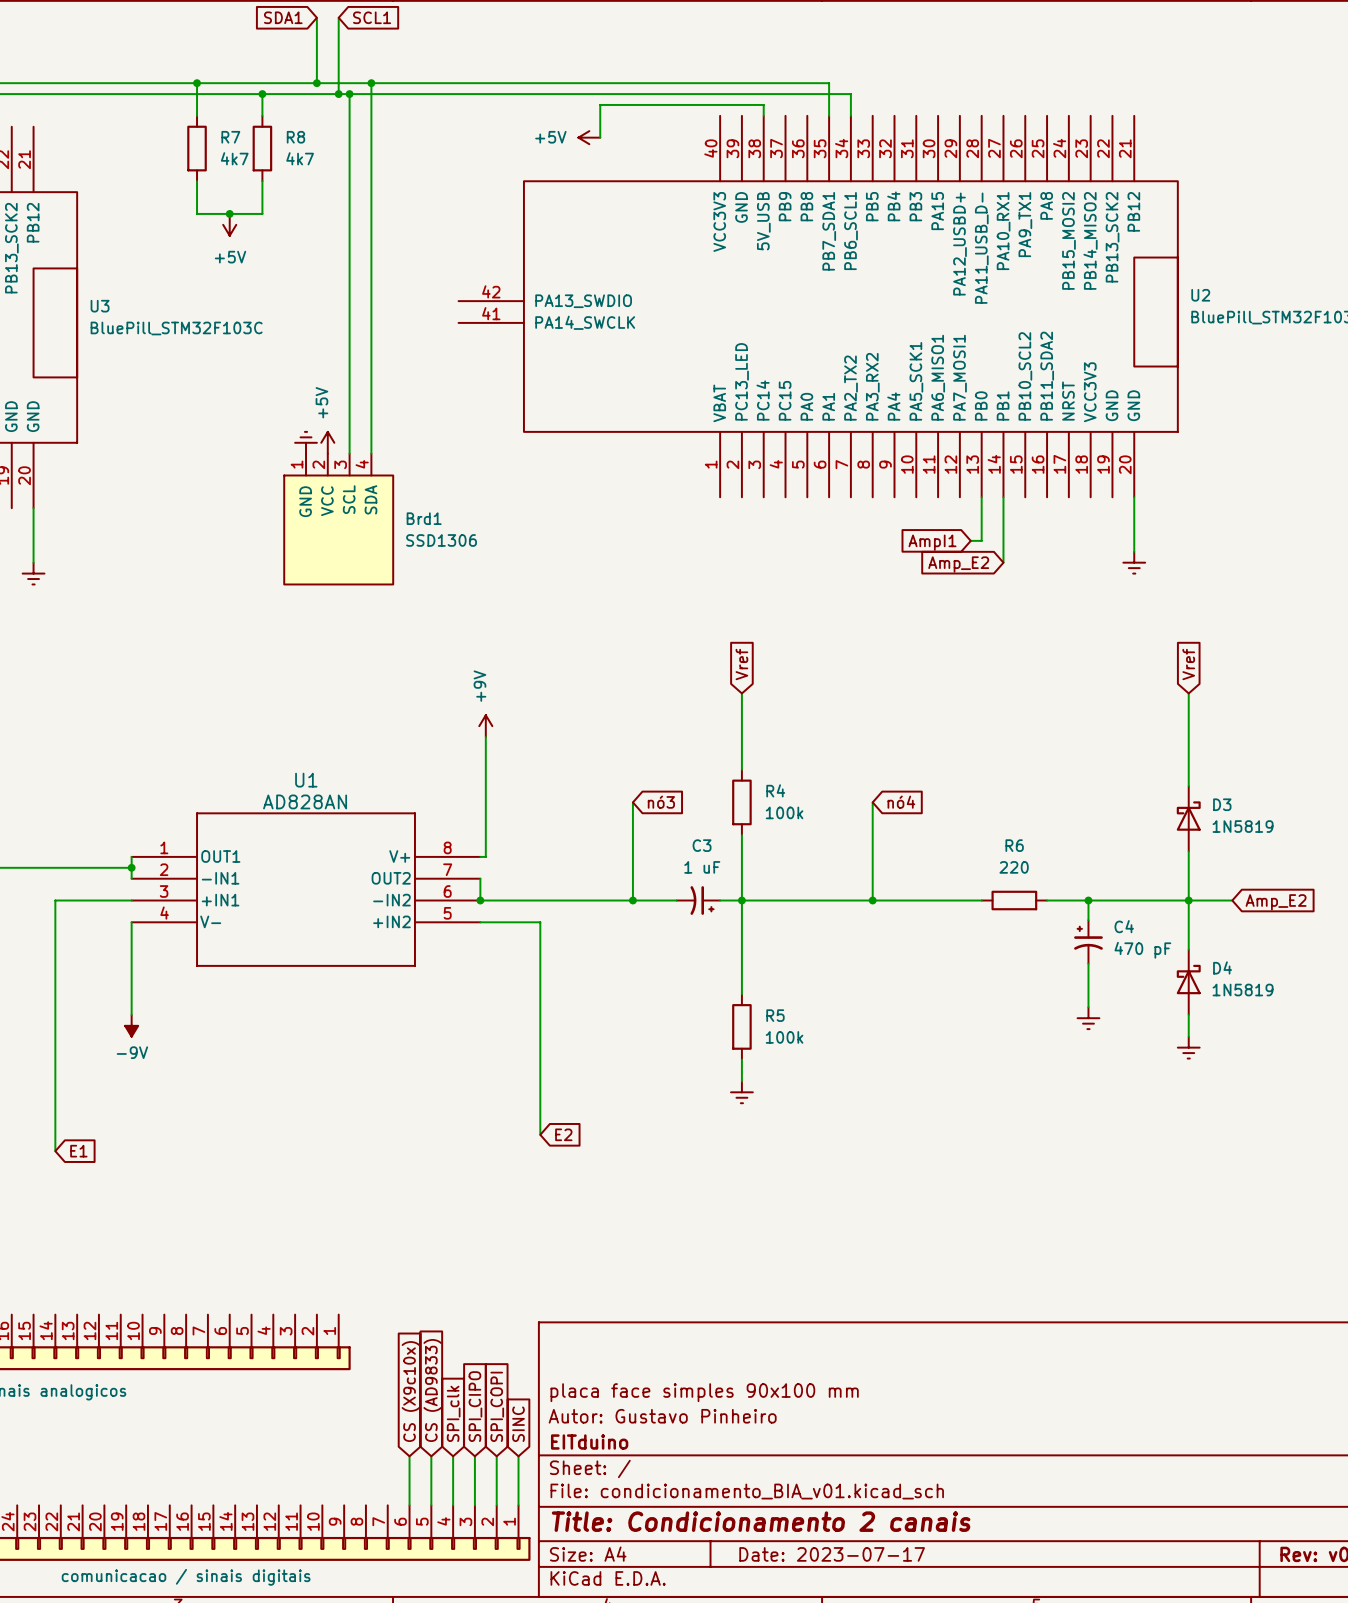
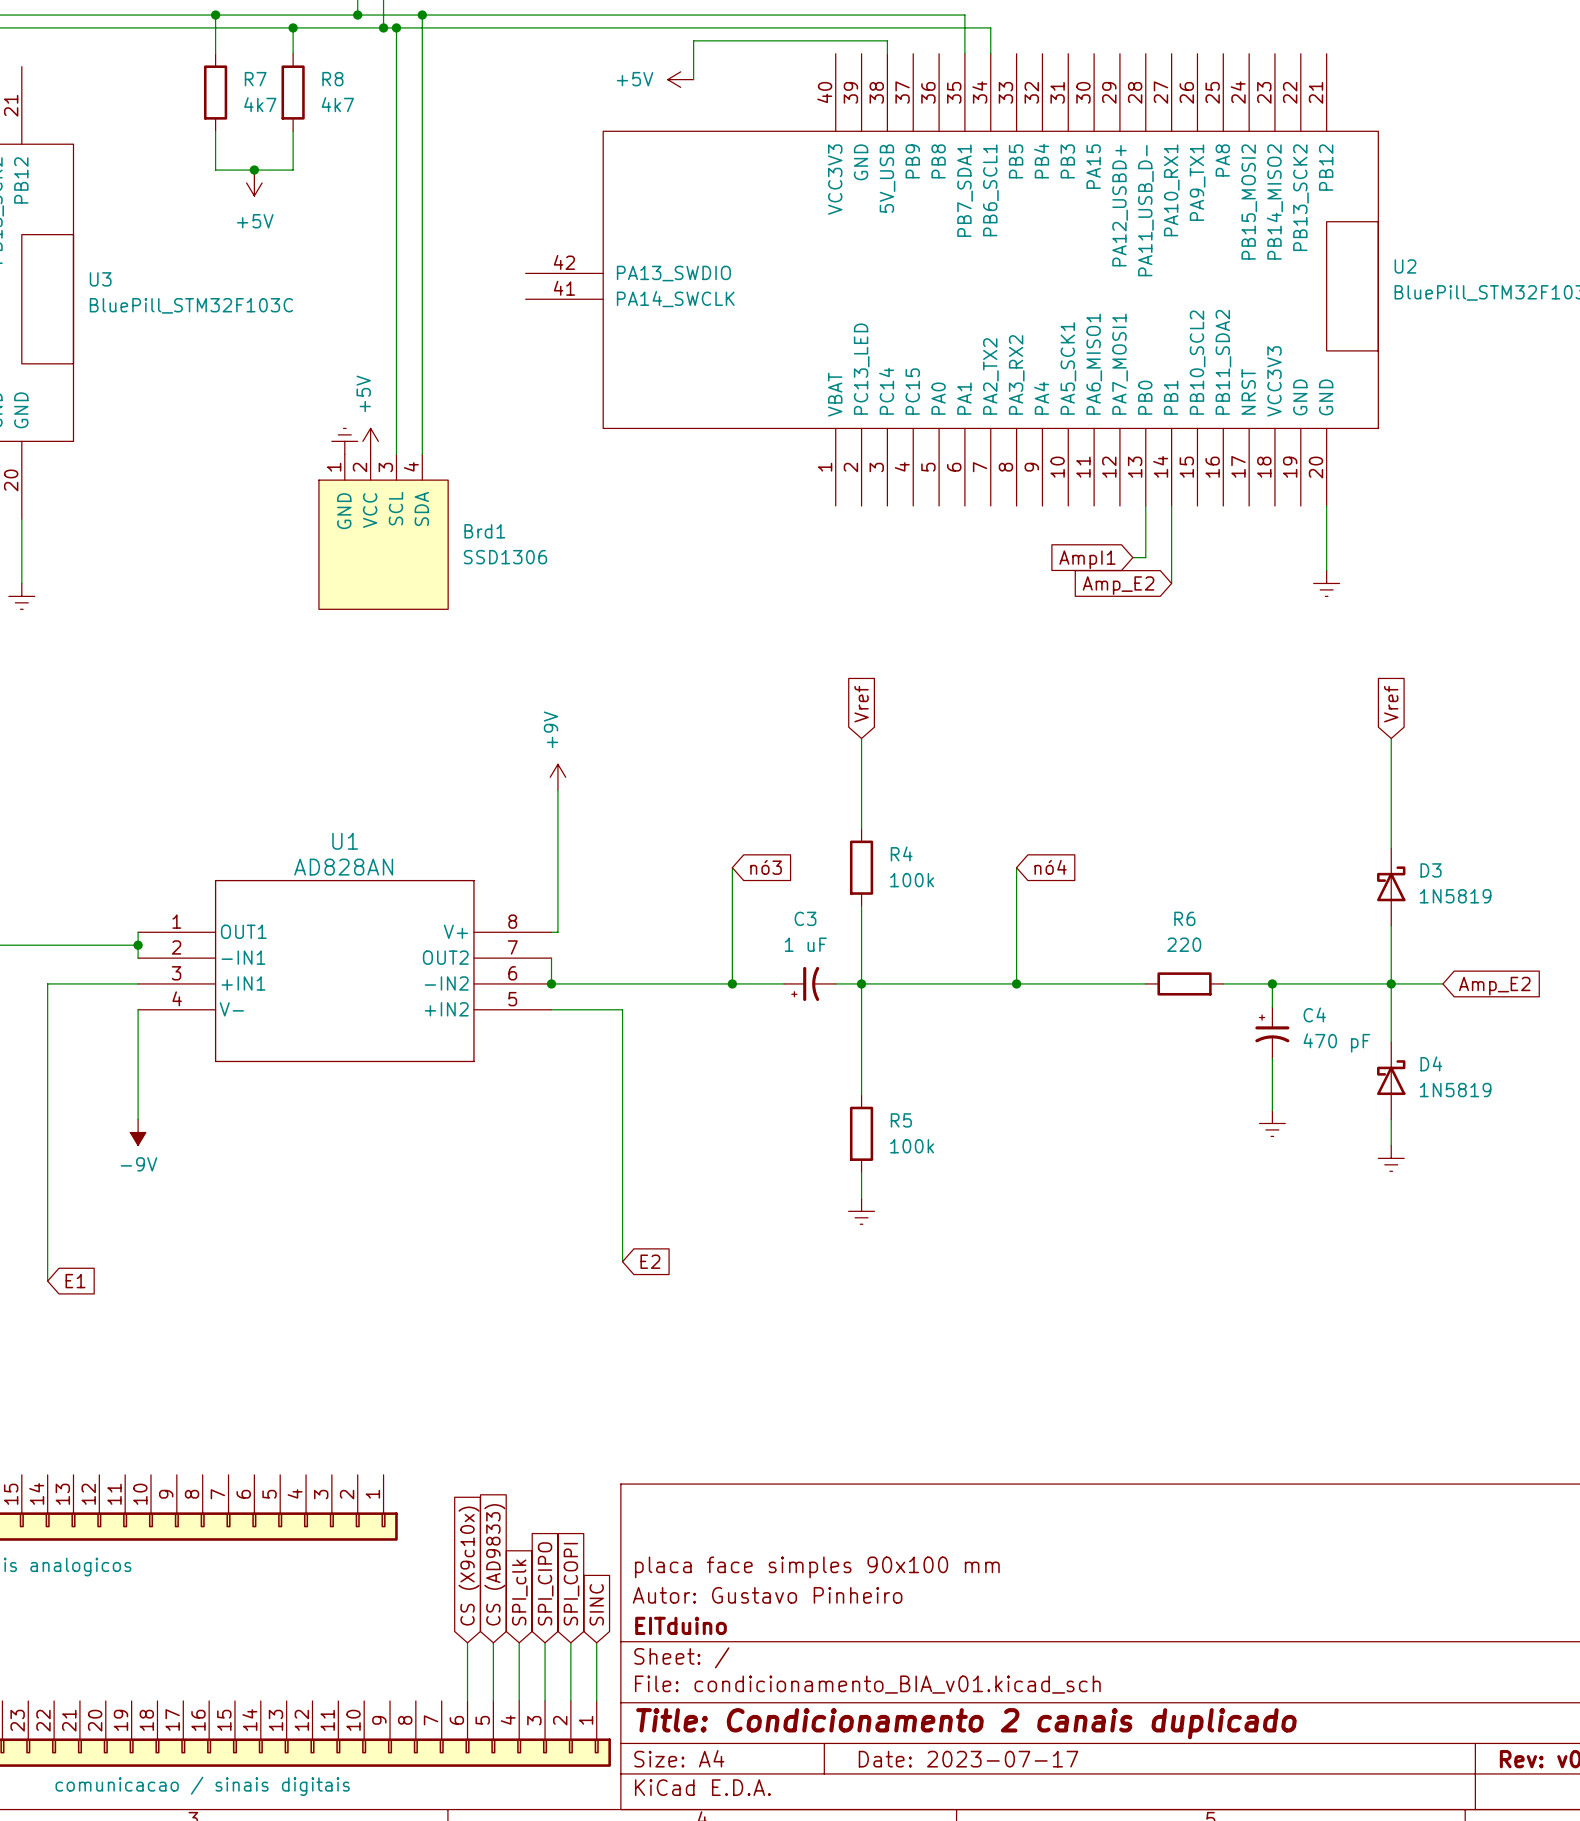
C3 flip: as is (702, 900) -> left-right (805, 983)
title block: Title: Condicionamento 2 canais (761, 1521) -> Title: Condicionamento 2 canais duplicado (966, 1723)

